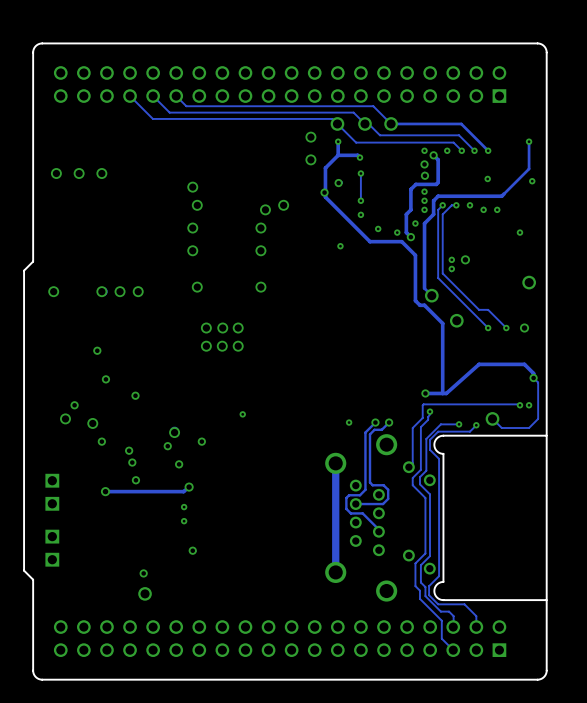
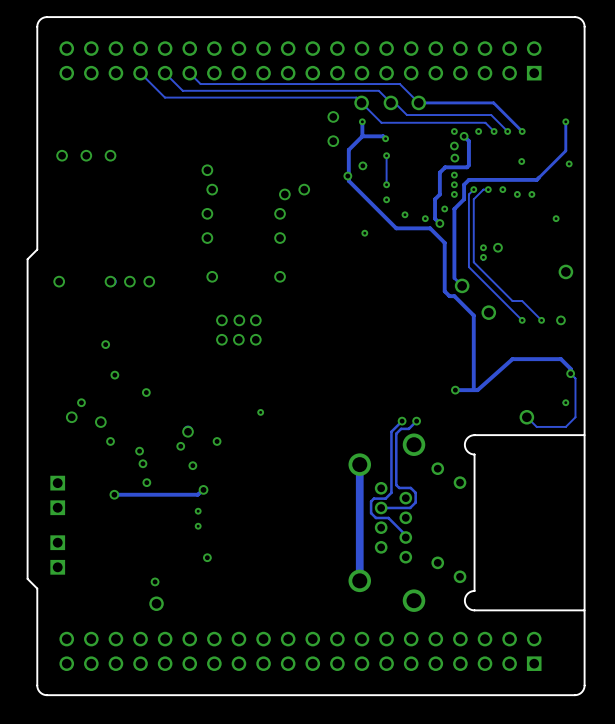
track: (519, 405) (423, 404) (422, 418) (412, 428) (412, 463) (408, 467) -> none
via: (519, 405) -> none
track: (429, 411) (428, 419) (420, 427) (420, 469) (412, 477) (412, 485) (425, 497) (425, 553) (415, 563) (415, 586) (419, 590) (419, 598) (441, 620) (441, 638) (453, 650) -> none
via: (429, 411) -> none
via: (349, 422) -> none
track: (459, 424) (440, 424) (426, 438) (426, 470) (419, 477) (419, 484) (429, 494) (429, 556) (420, 565) (420, 582) (425, 587) (425, 596) (440, 611) (449, 611) (453, 616) (453, 627) -> none
via: (459, 424) -> none
track: (476, 425) (469, 431) (438, 431) (429, 439) (429, 449) (439, 458) (439, 576) (429, 586) (429, 595) (438, 604) (464, 604) (476, 616) (476, 627) -> none
via: (476, 425) -> none

